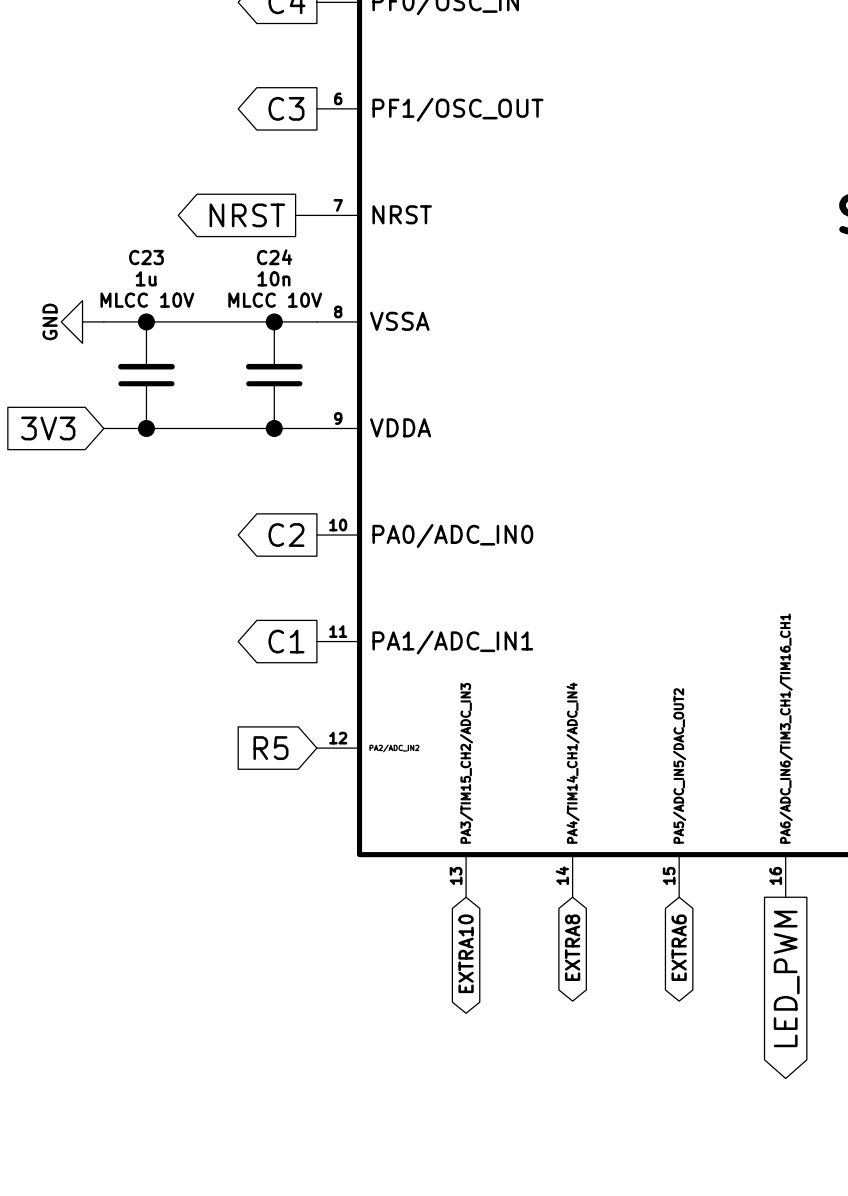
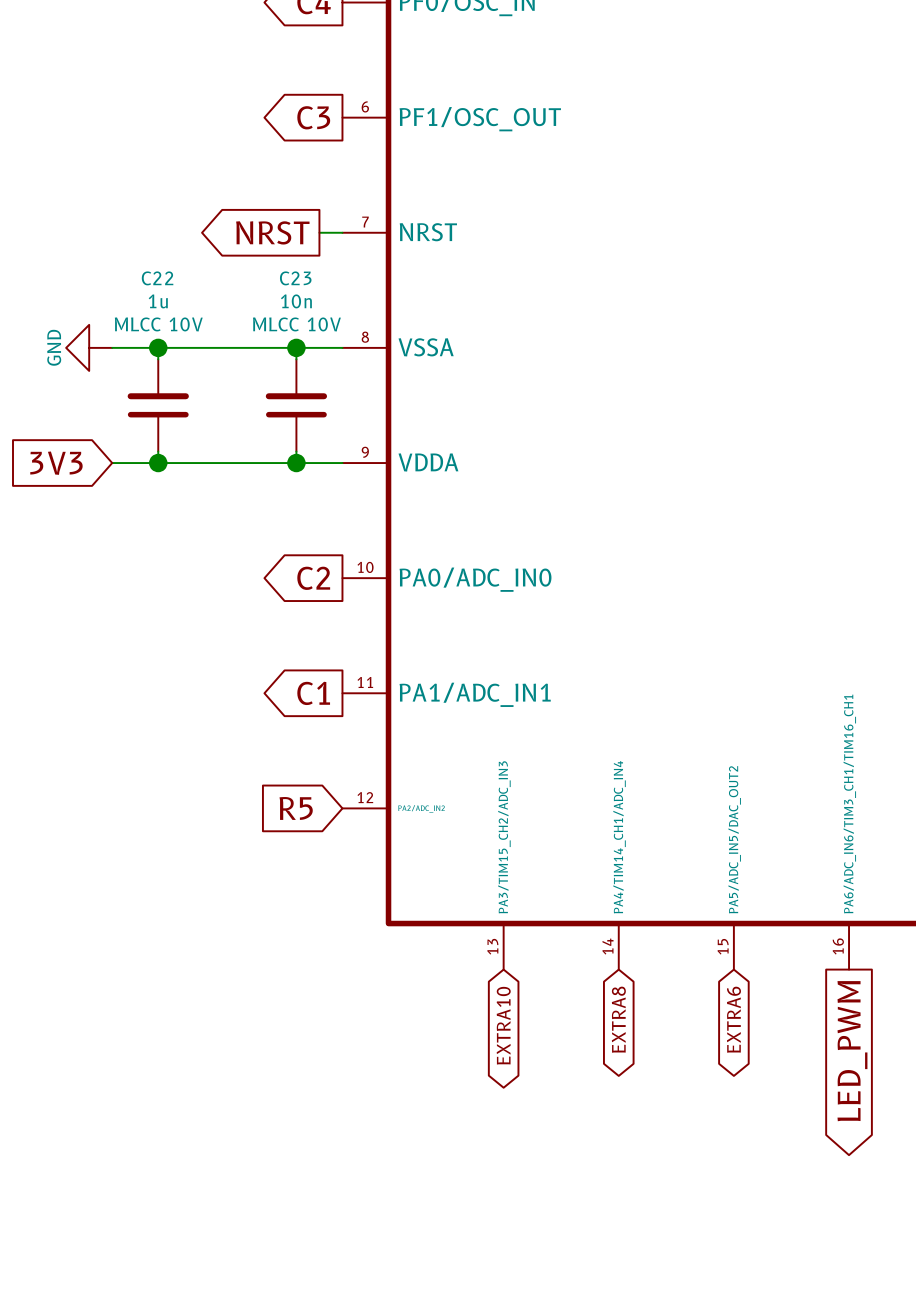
C23 name: C23 (146, 257) -> C22 (157, 278)
C24 name: C24 (274, 257) -> C23 (295, 278)

